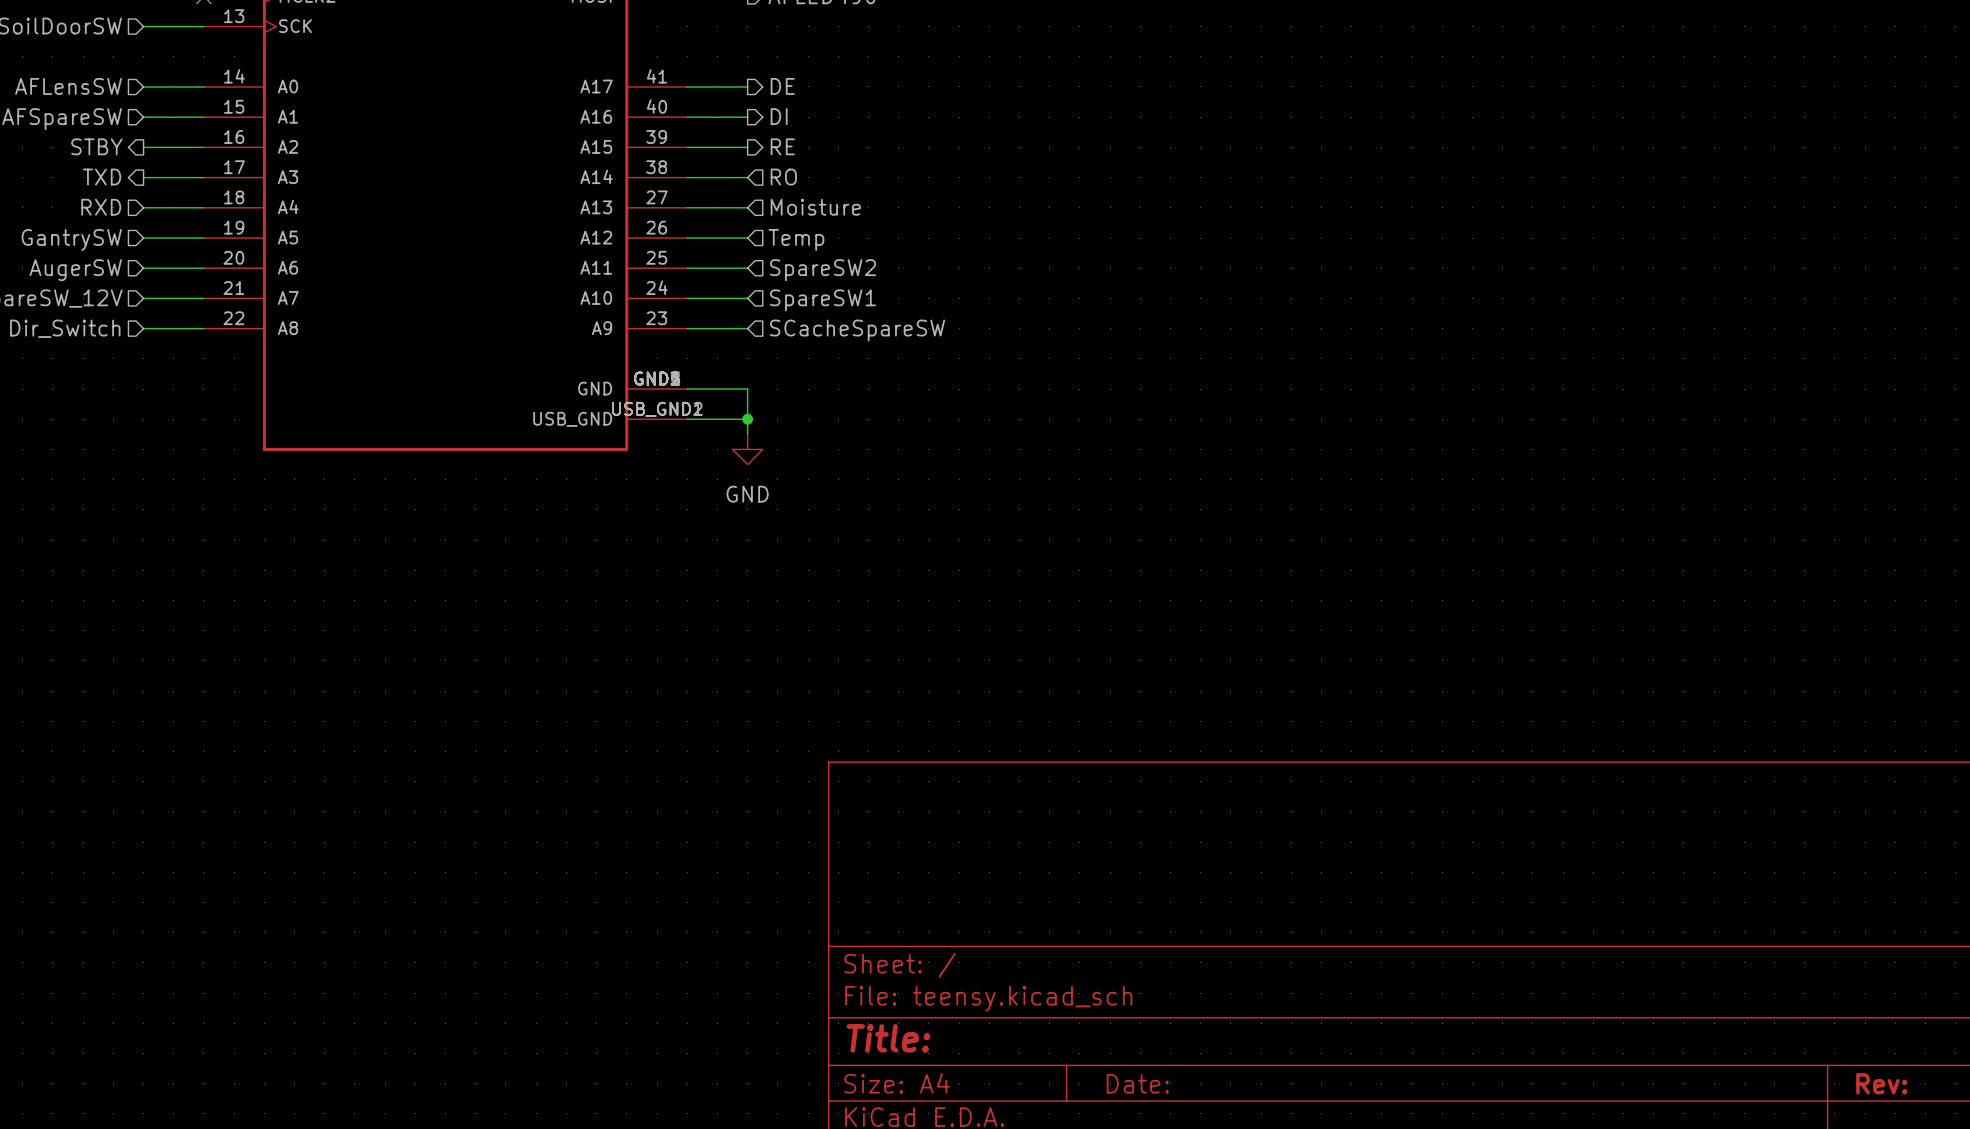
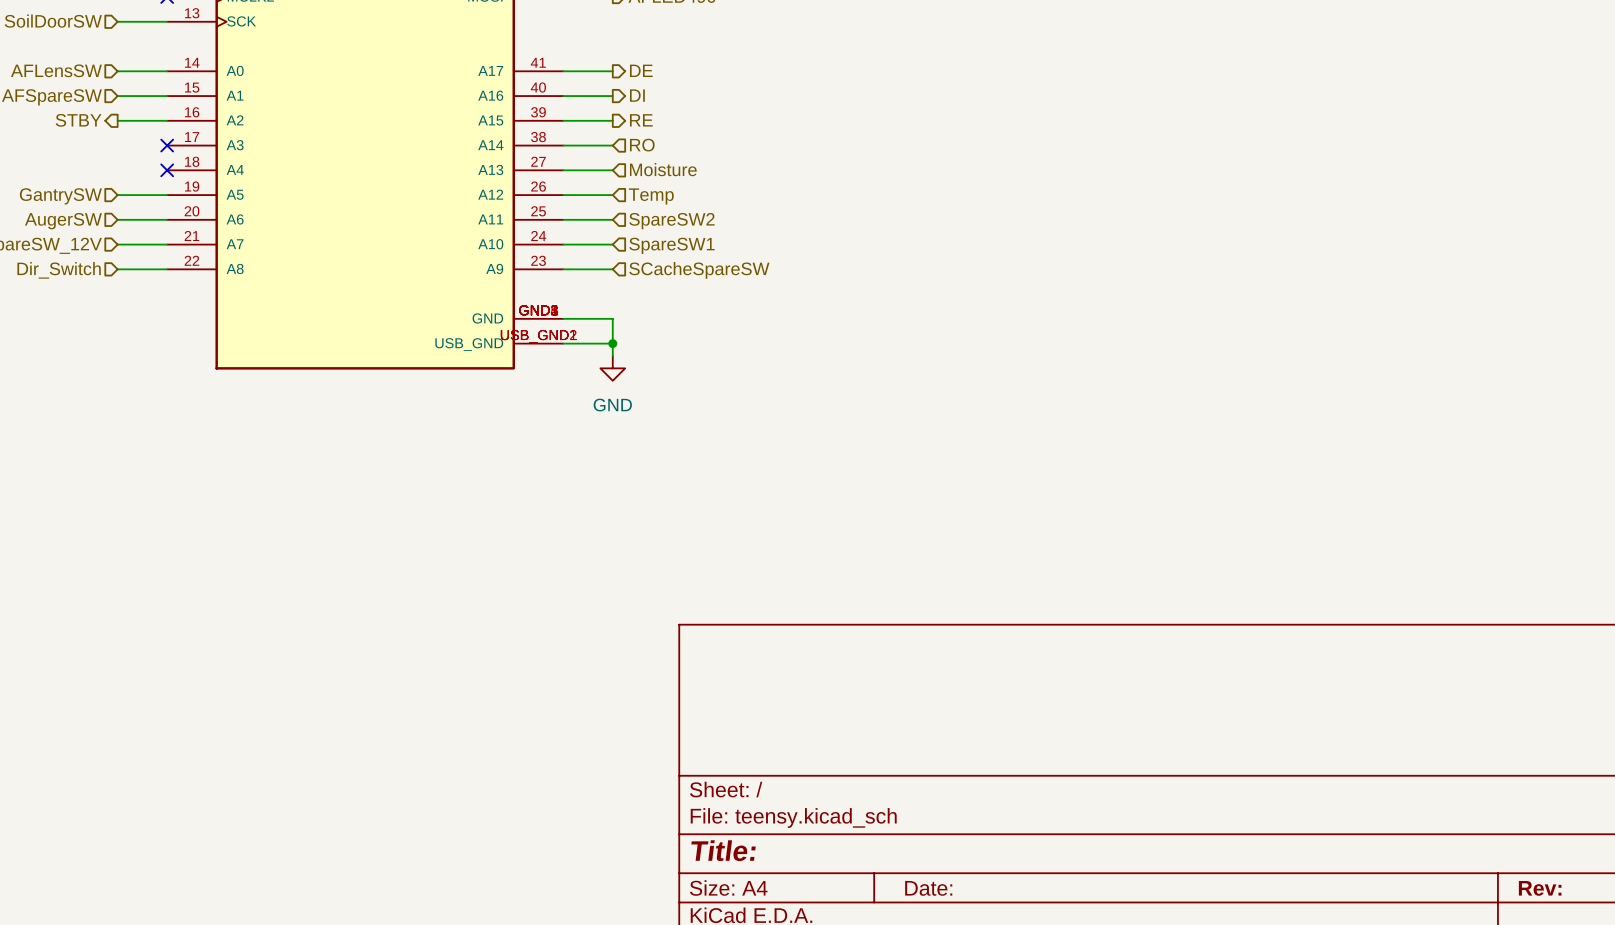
hierarchical label: TXD (101, 177) -> none
wire: (143, 177) (203, 177) -> none
no-connect mark: none -> (167, 145)
hierarchical label: RXD (101, 207) -> none
wire: (143, 207) (203, 207) -> none
no-connect mark: none -> (167, 170)

